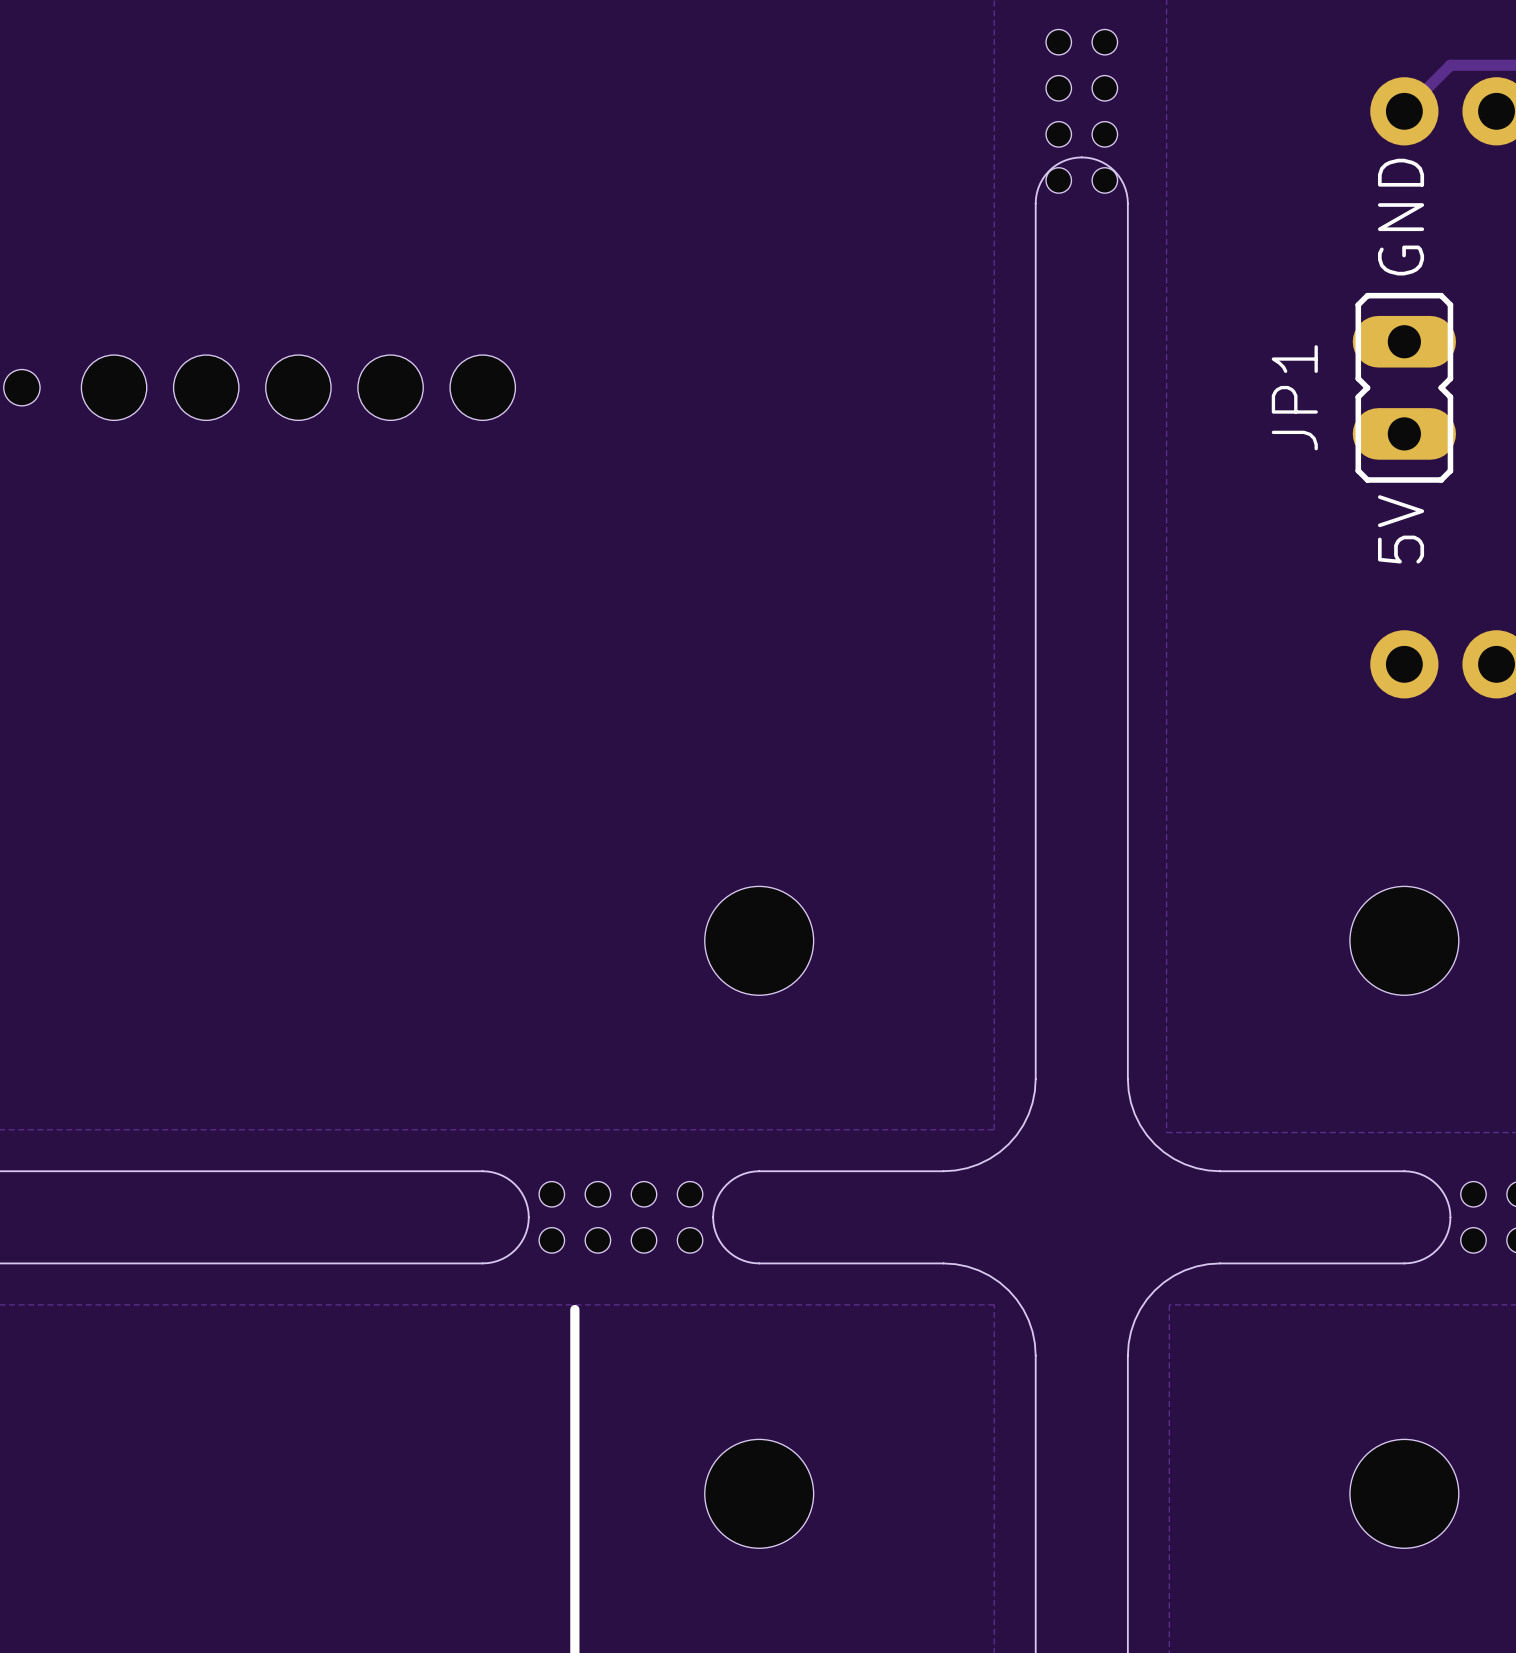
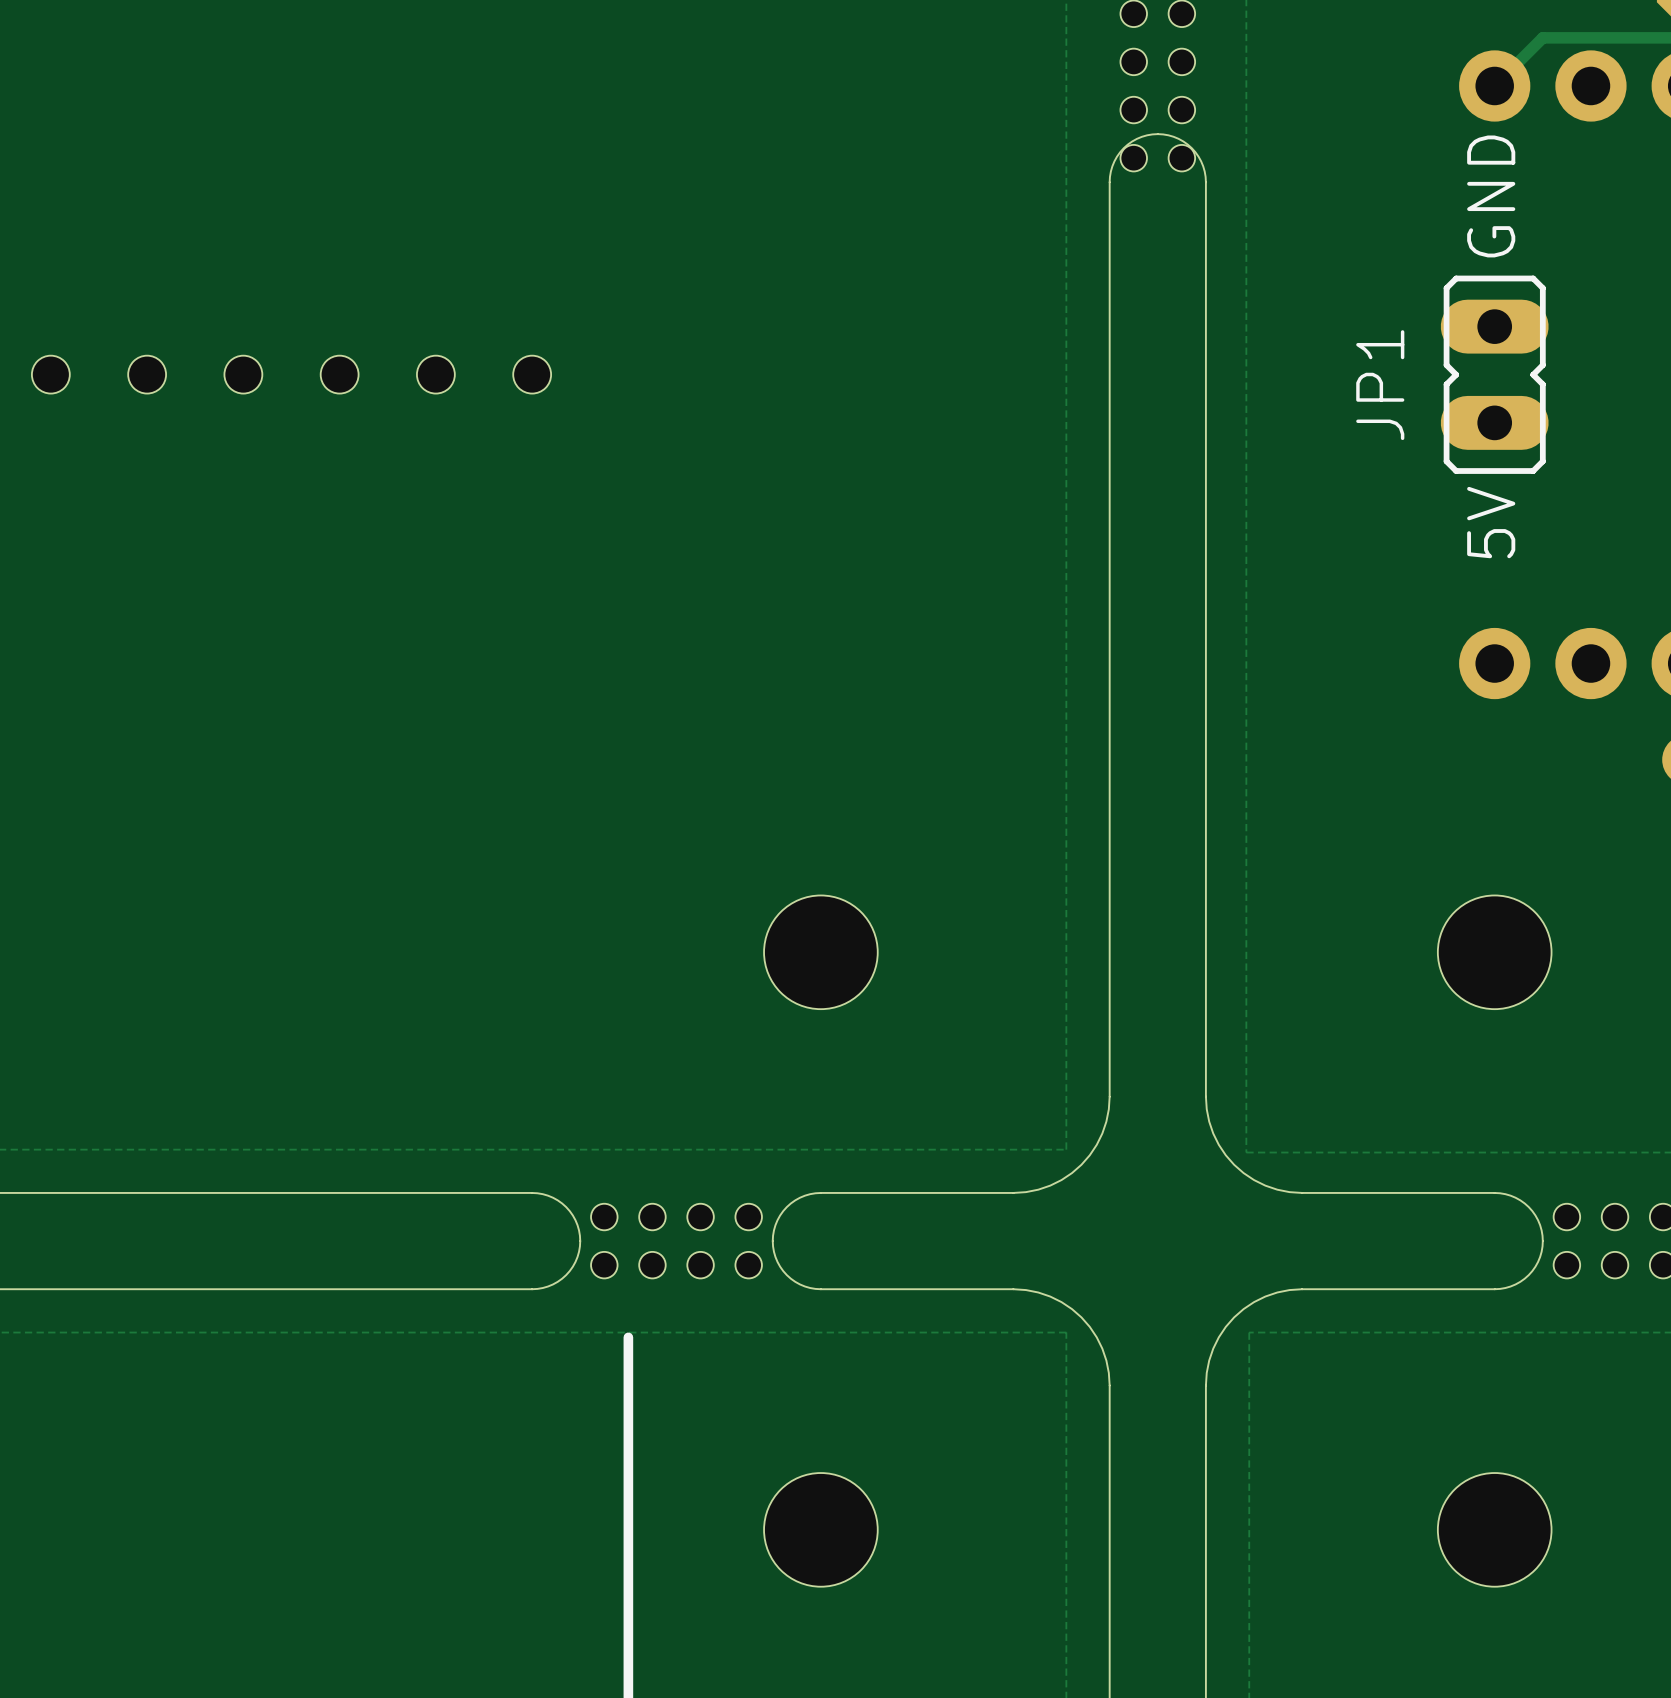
part footprint: [81, 355, 147, 421] -> [128, 355, 167, 394]
part footprint: [173, 355, 239, 421] -> [224, 355, 263, 394]
part footprint: [265, 355, 332, 421] -> [320, 355, 359, 394]
part footprint: [357, 355, 424, 421] -> [416, 355, 455, 394]
part footprint: [450, 355, 516, 421] -> [513, 355, 552, 394]

